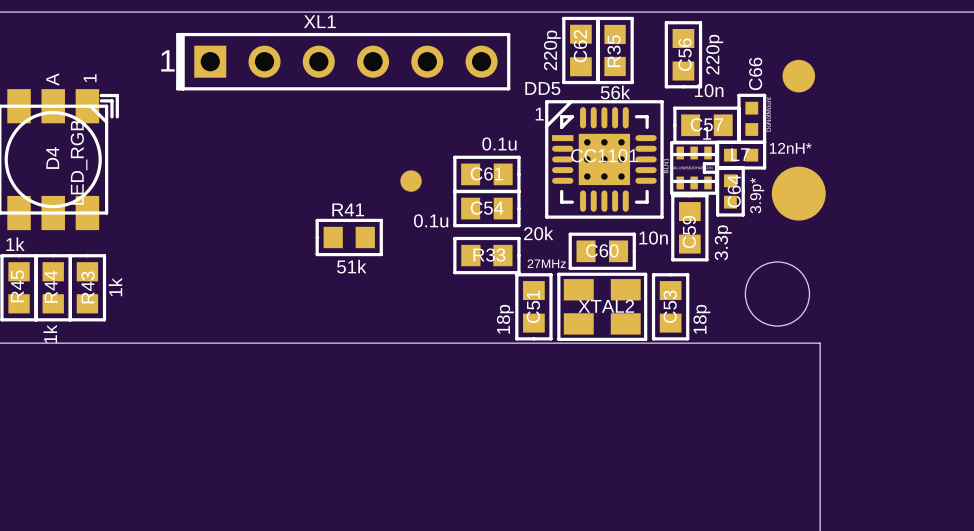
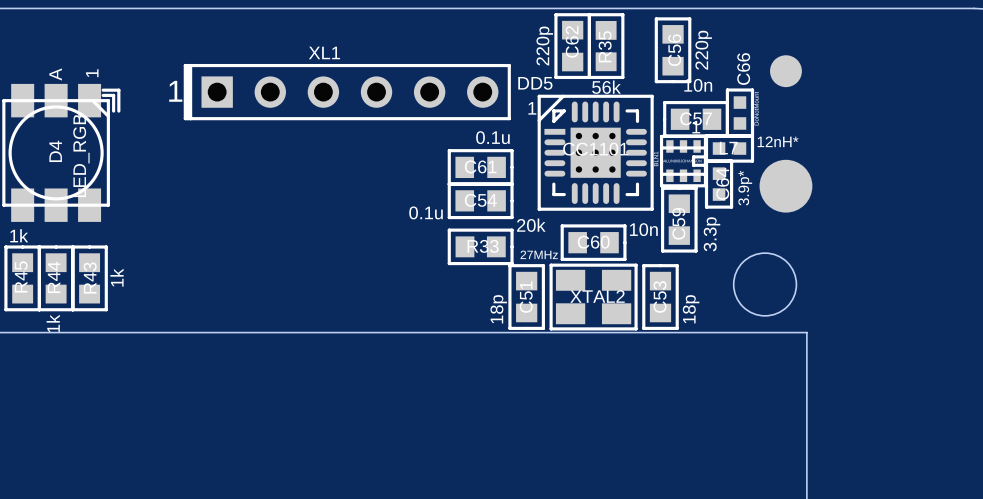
XL1 position: (343, 61) -> (347, 92)
part: (411, 181) -> none
R41: 51k (349, 237) -> none

